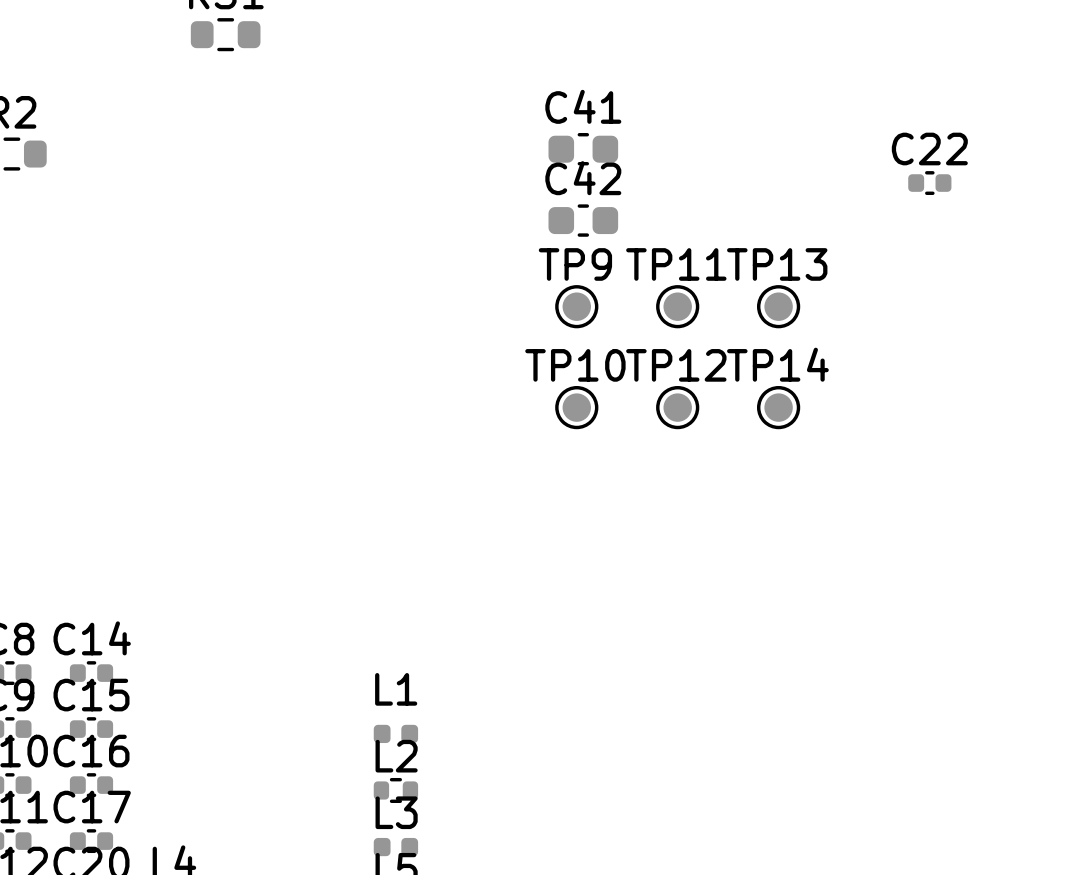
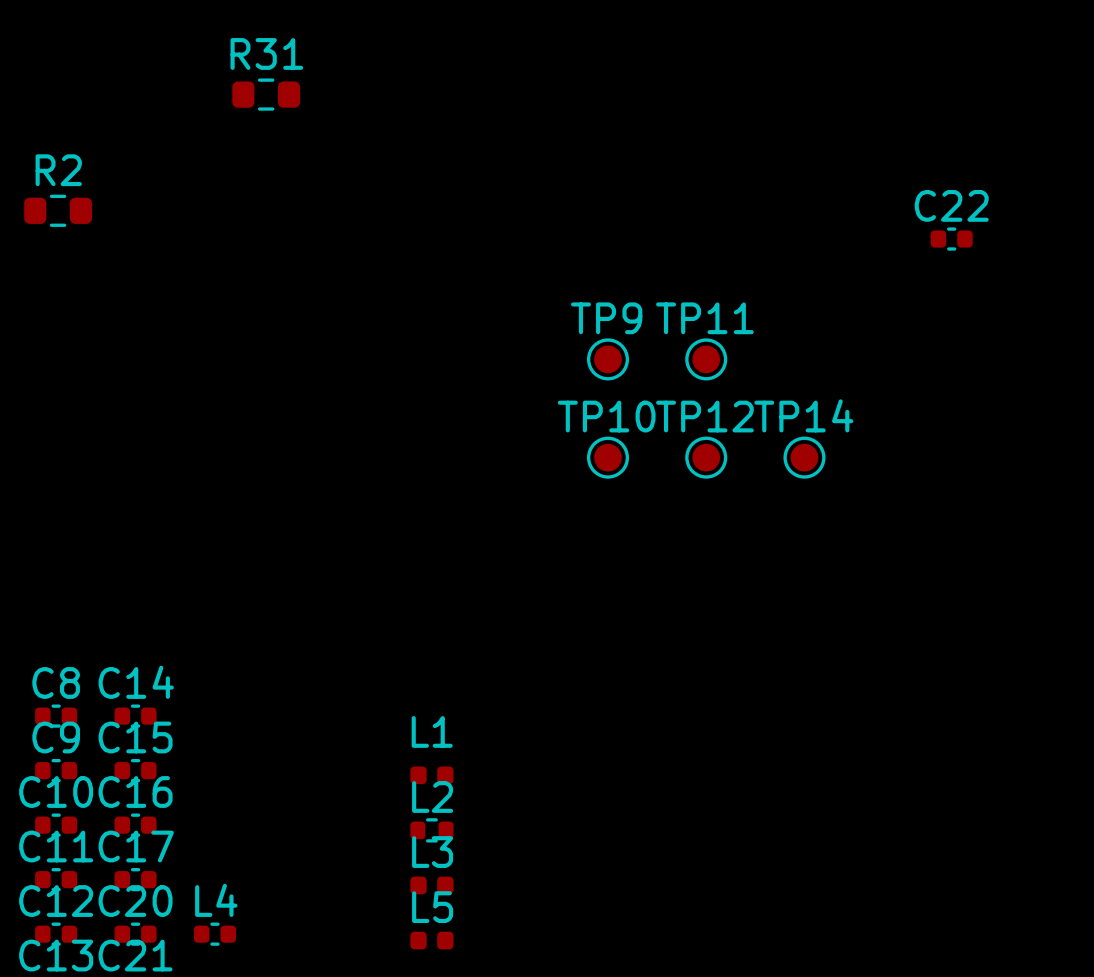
C41: (583, 149) -> none
C42: (583, 220) -> none
TP13: (778, 306) -> none

